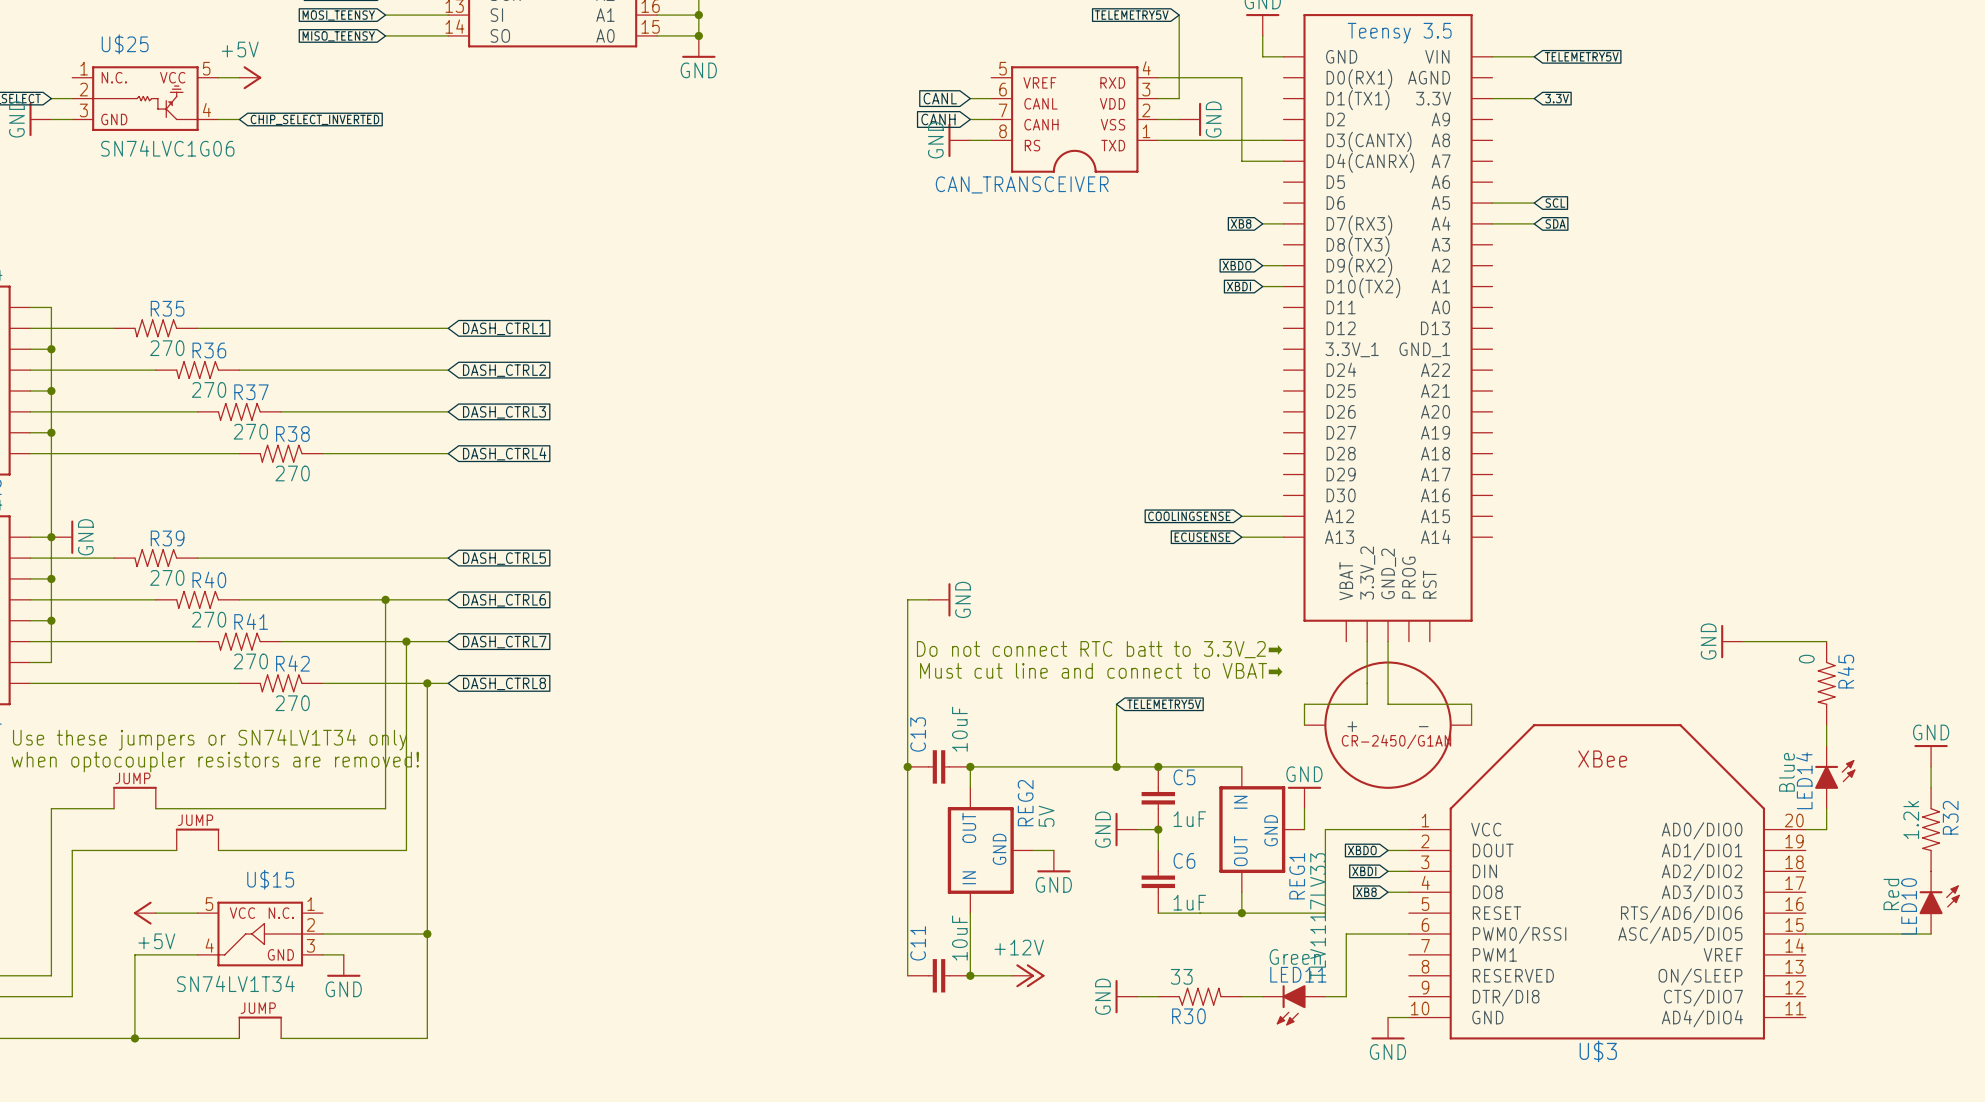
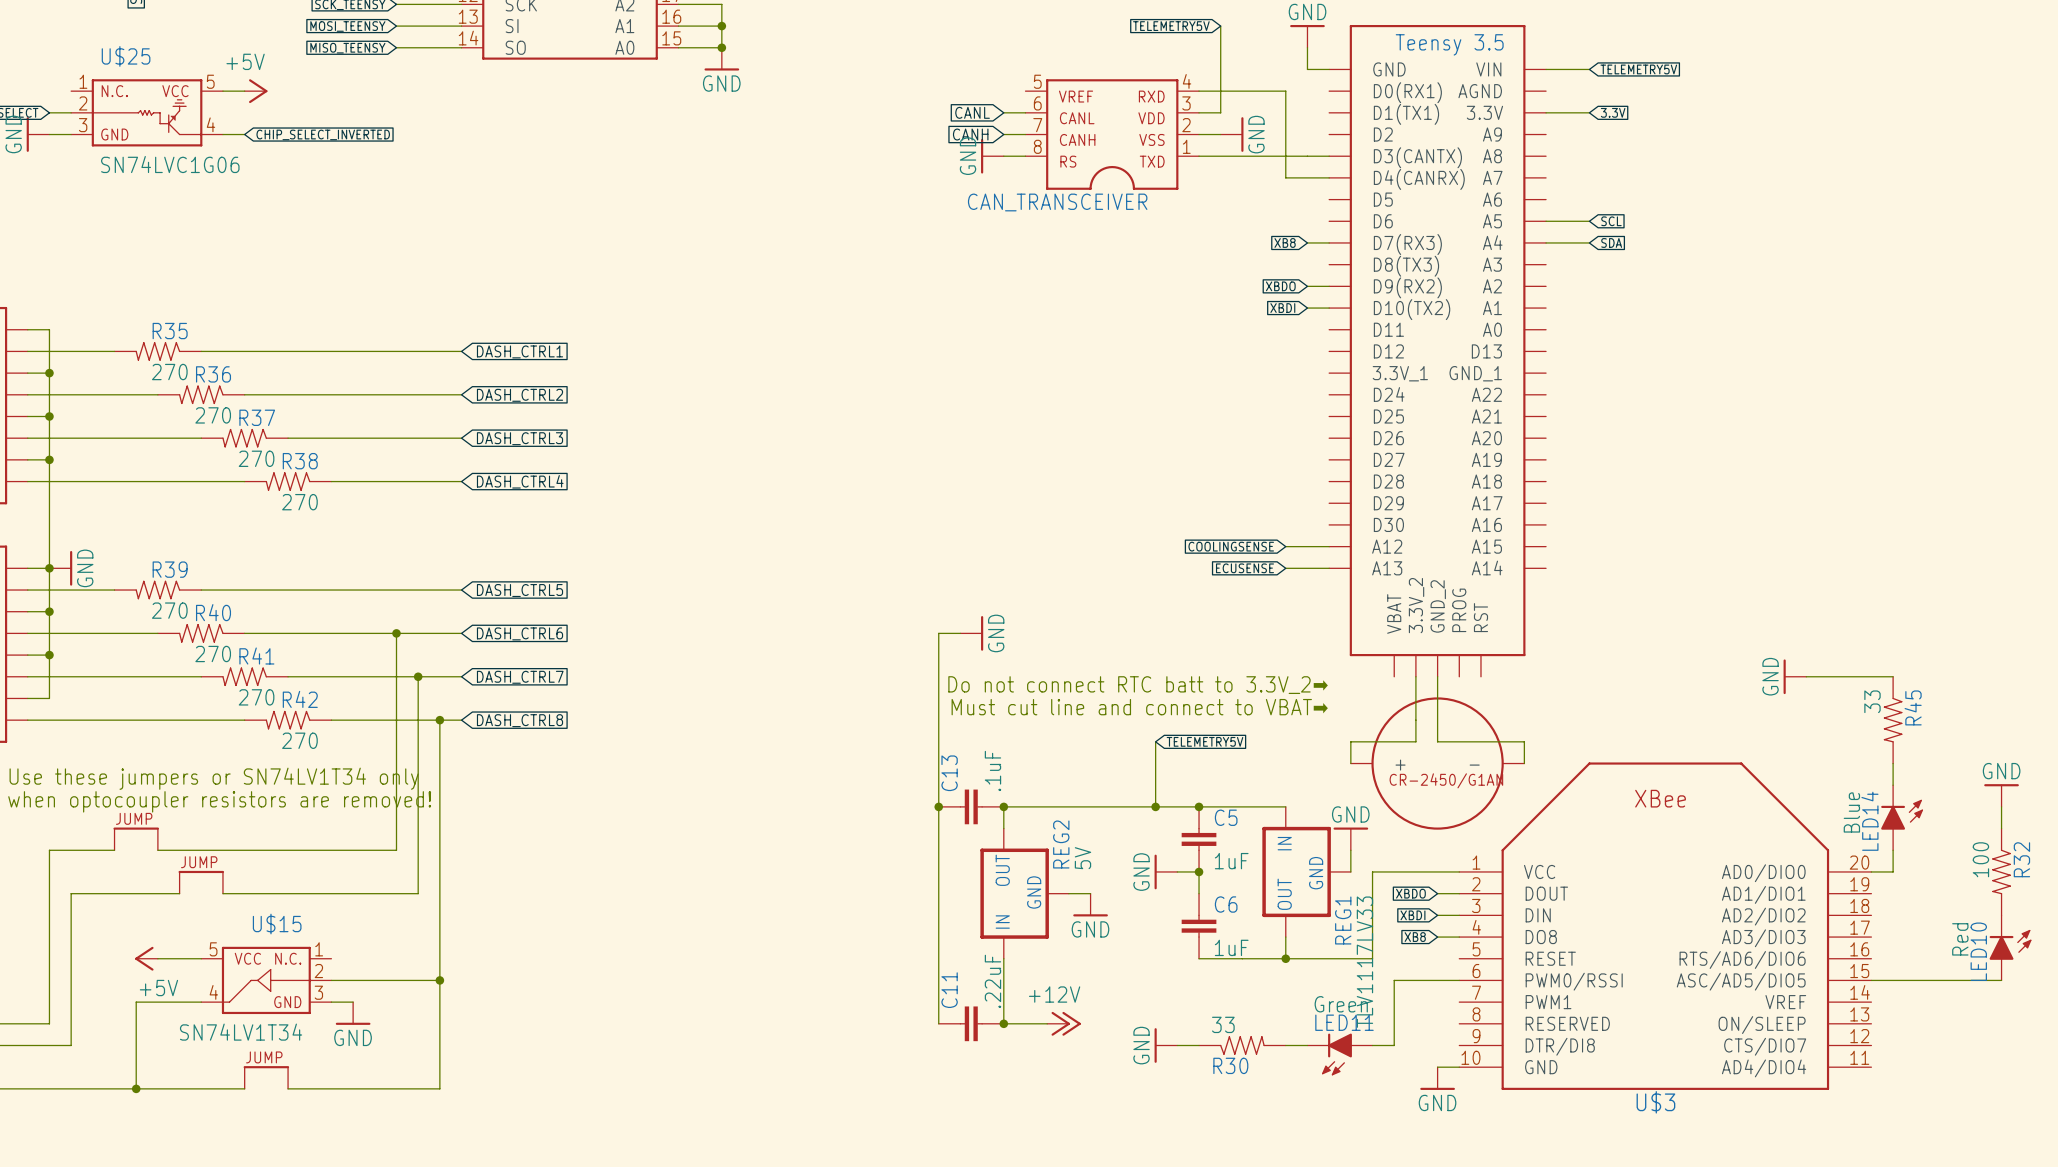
R45 value: 0 (1806, 659) -> 33 (1872, 701)
C13 value: 10uF (959, 729) -> .1uF (992, 770)
R32 value: 1.2k (1911, 820) -> 100 (1980, 859)
C11 value: 10uF (959, 938) -> .22uF (992, 981)

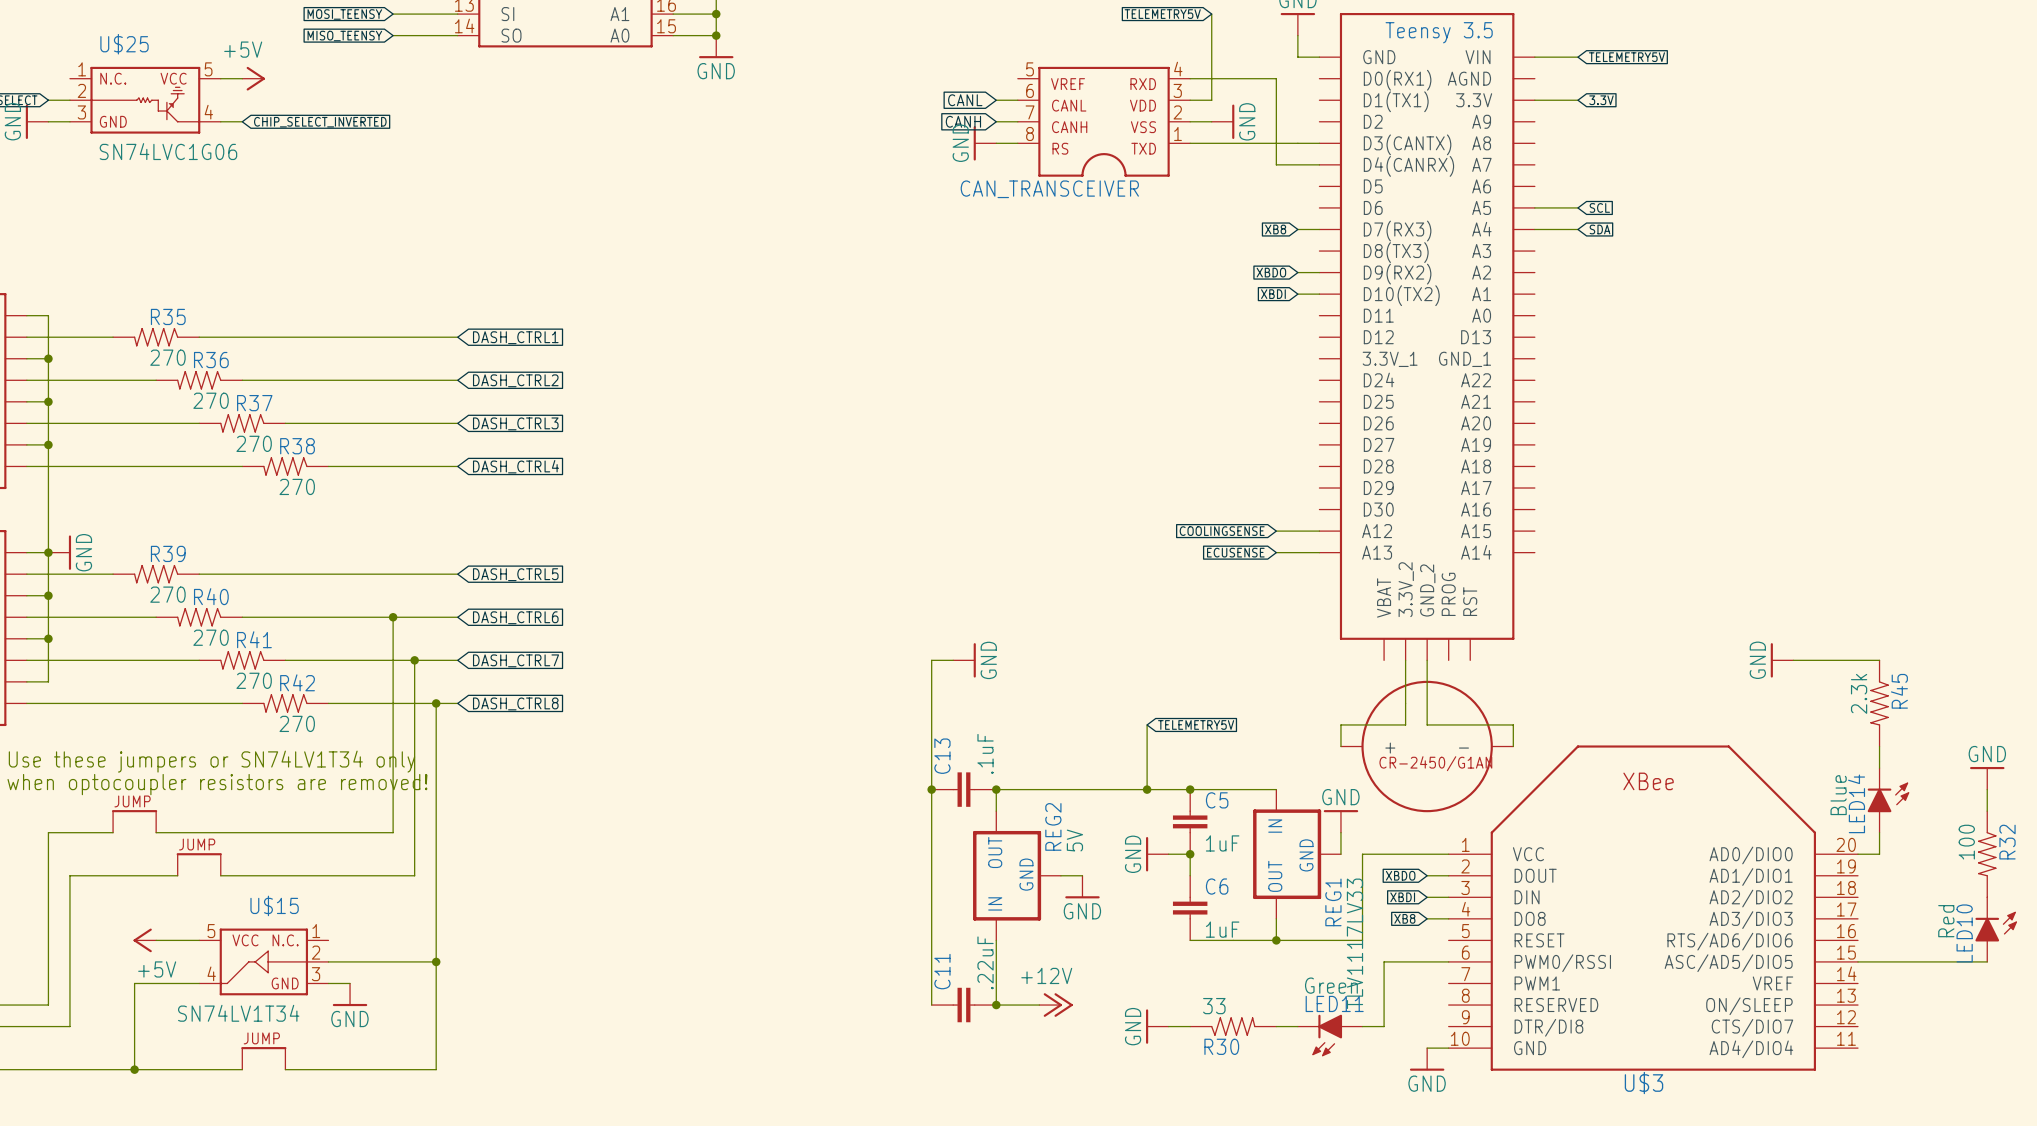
wire: (960, 633) (938, 633) (938, 676) -> (953, 660) (931, 660)
power symbol position: GND (971, 633) -> GND (964, 660)
text: Do not connect RTC batt to 3.3V_2➡ (1138, 685) -> none
R45 value: 33 (1872, 701) -> 2.3k (1859, 693)
text: Must cut line and connect to VBAT➡ (1140, 707) -> none

